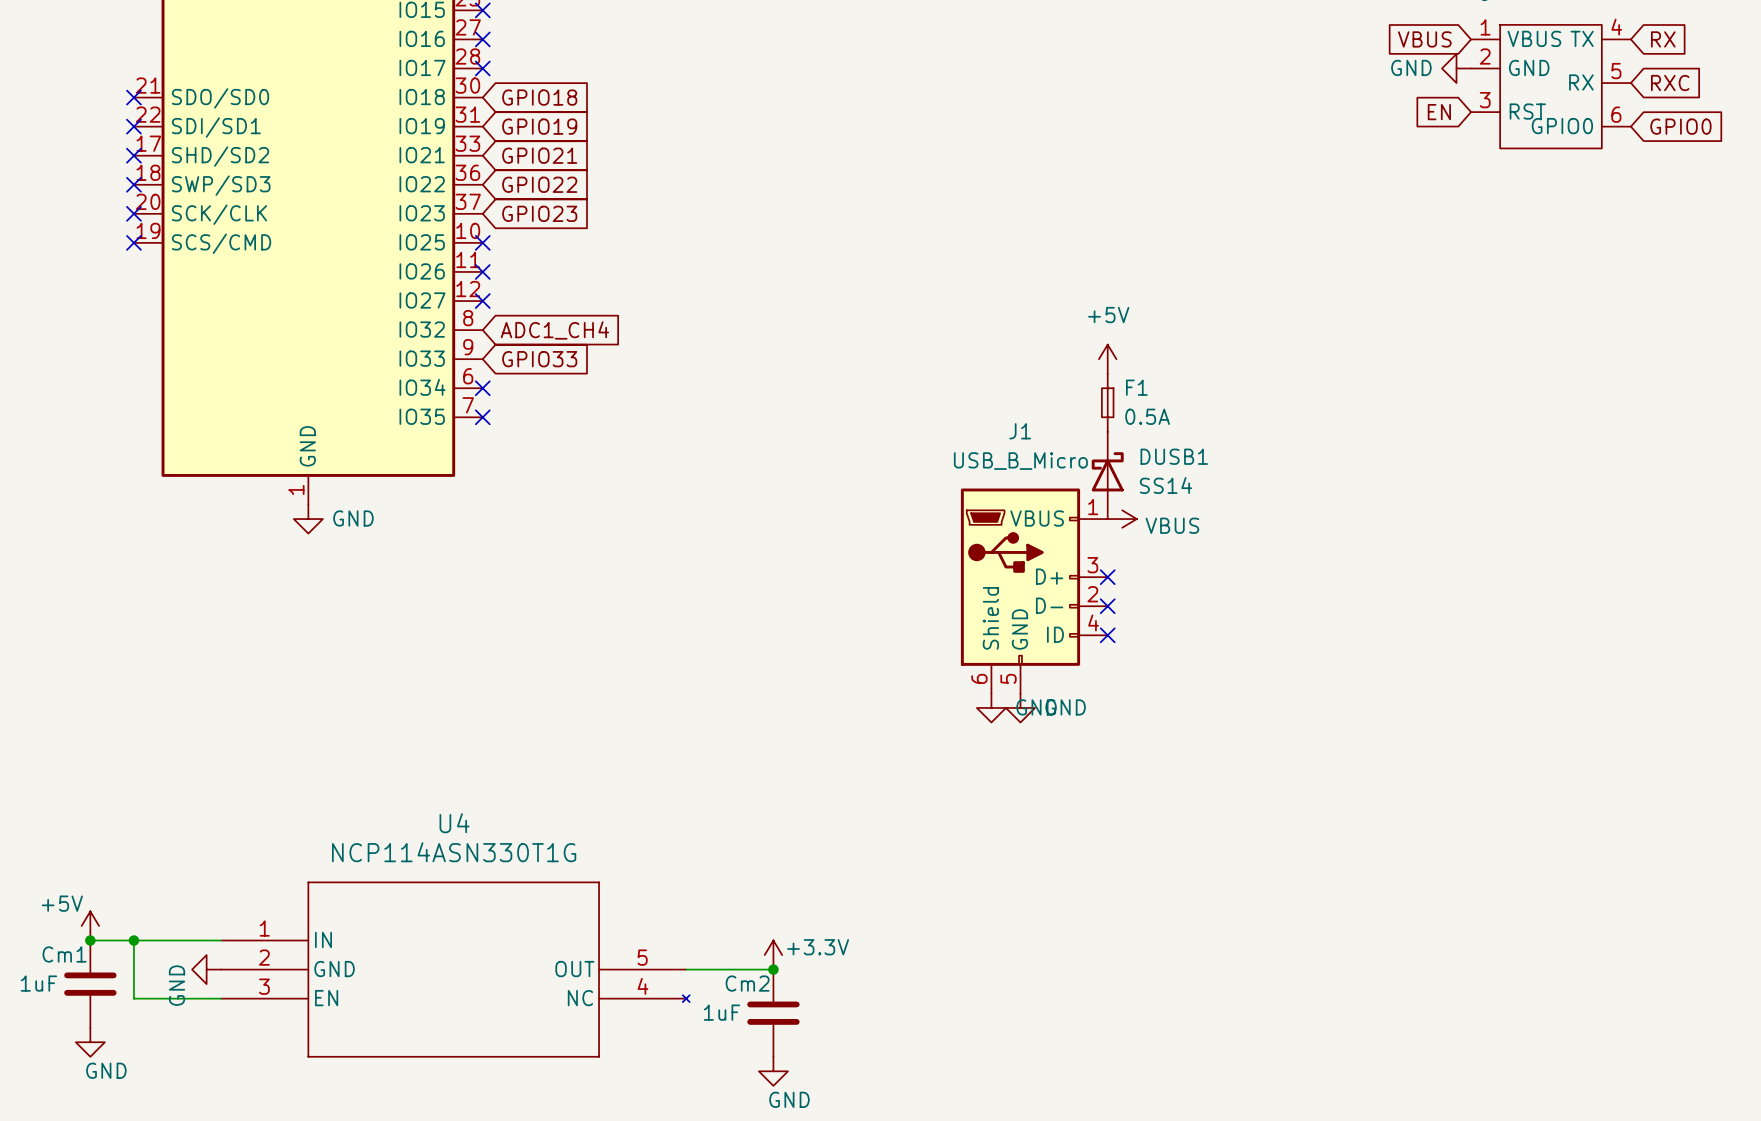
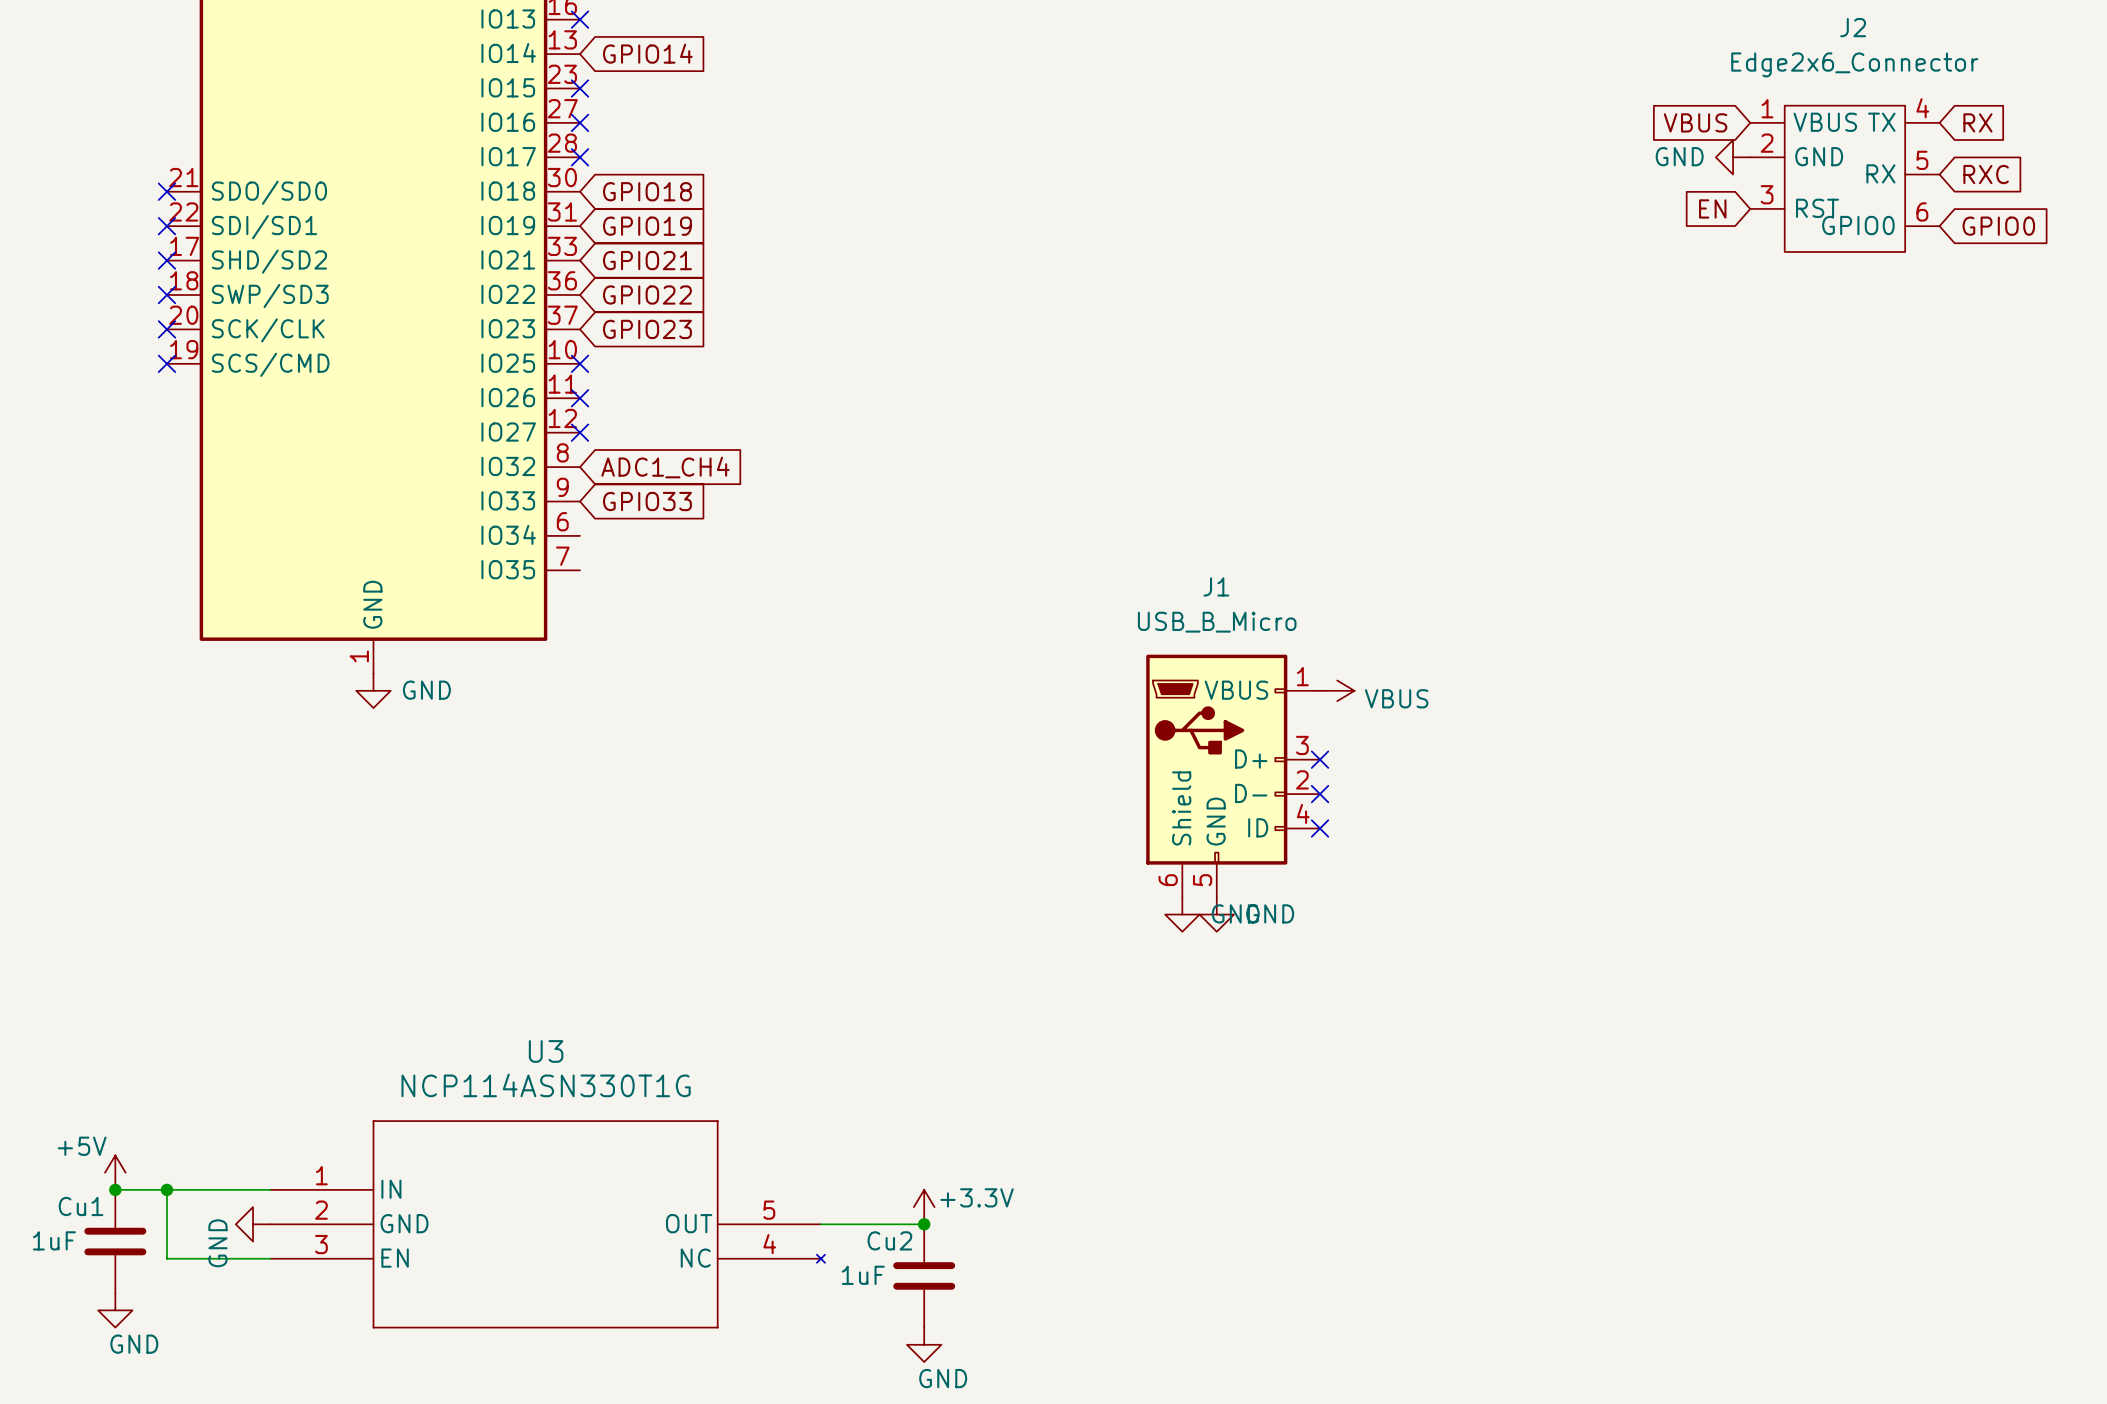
power symbol: +5V (1107, 359) -> none
no-connect mark: (482, 388) -> none
F1: 0.5A (1107, 402) -> none
no-connect mark: (482, 417) -> none
DUSB1: SS14 (1107, 475) -> none
U4 name: U4 (454, 823) -> U3 (546, 1051)
Cm1 name: Cm1 (64, 954) -> Cu1 (81, 1206)
Cm2 name: Cm2 (747, 983) -> Cu2 (889, 1240)

